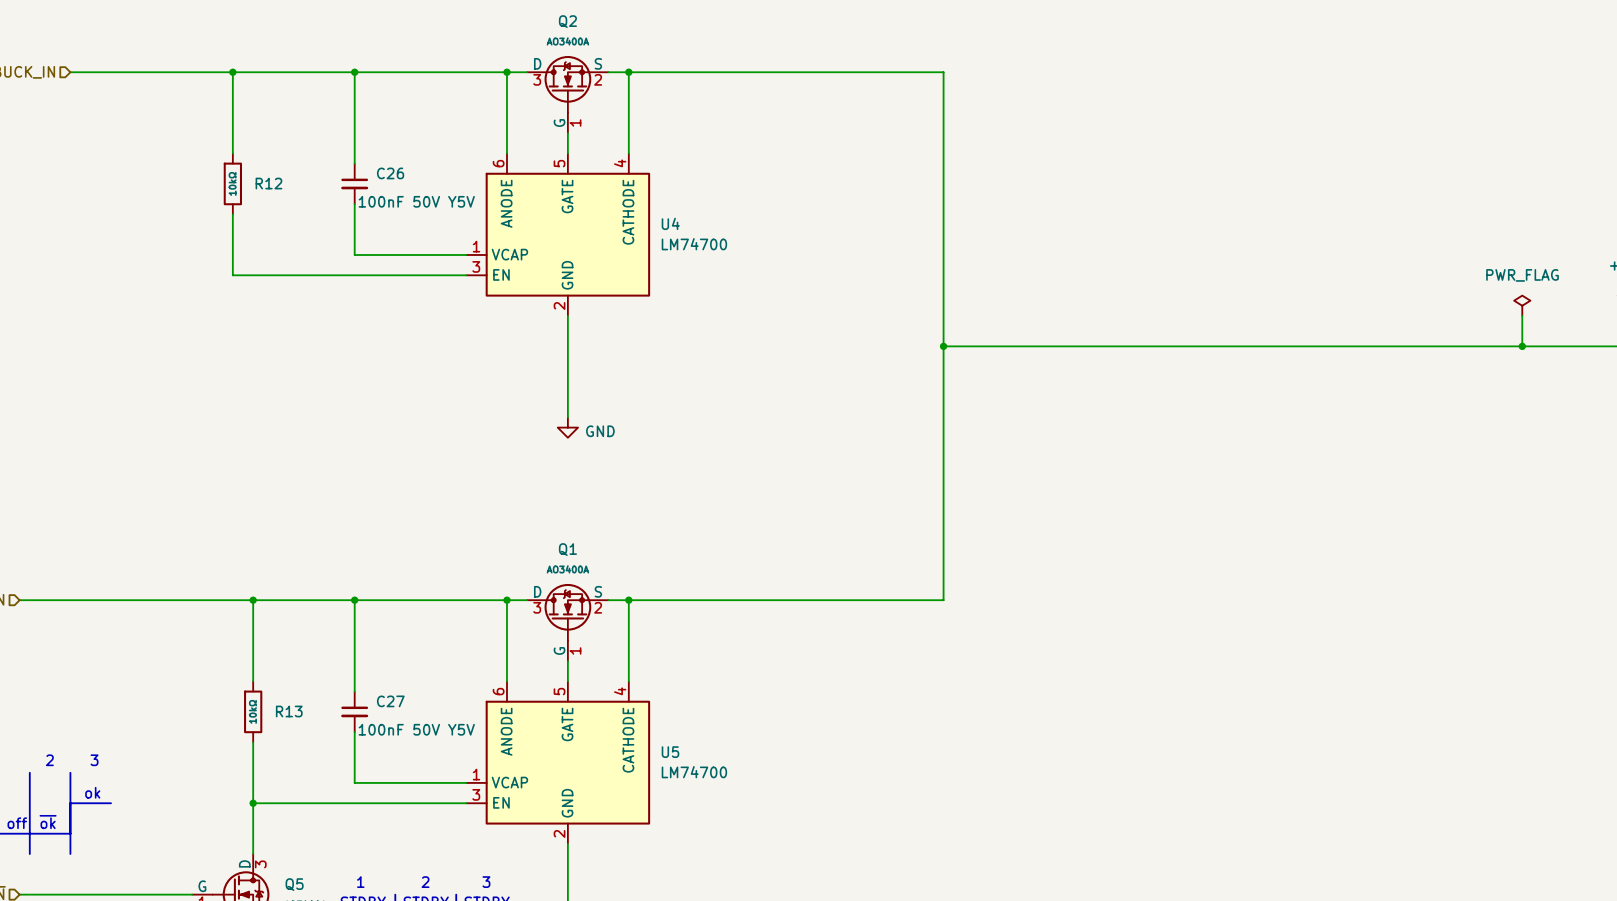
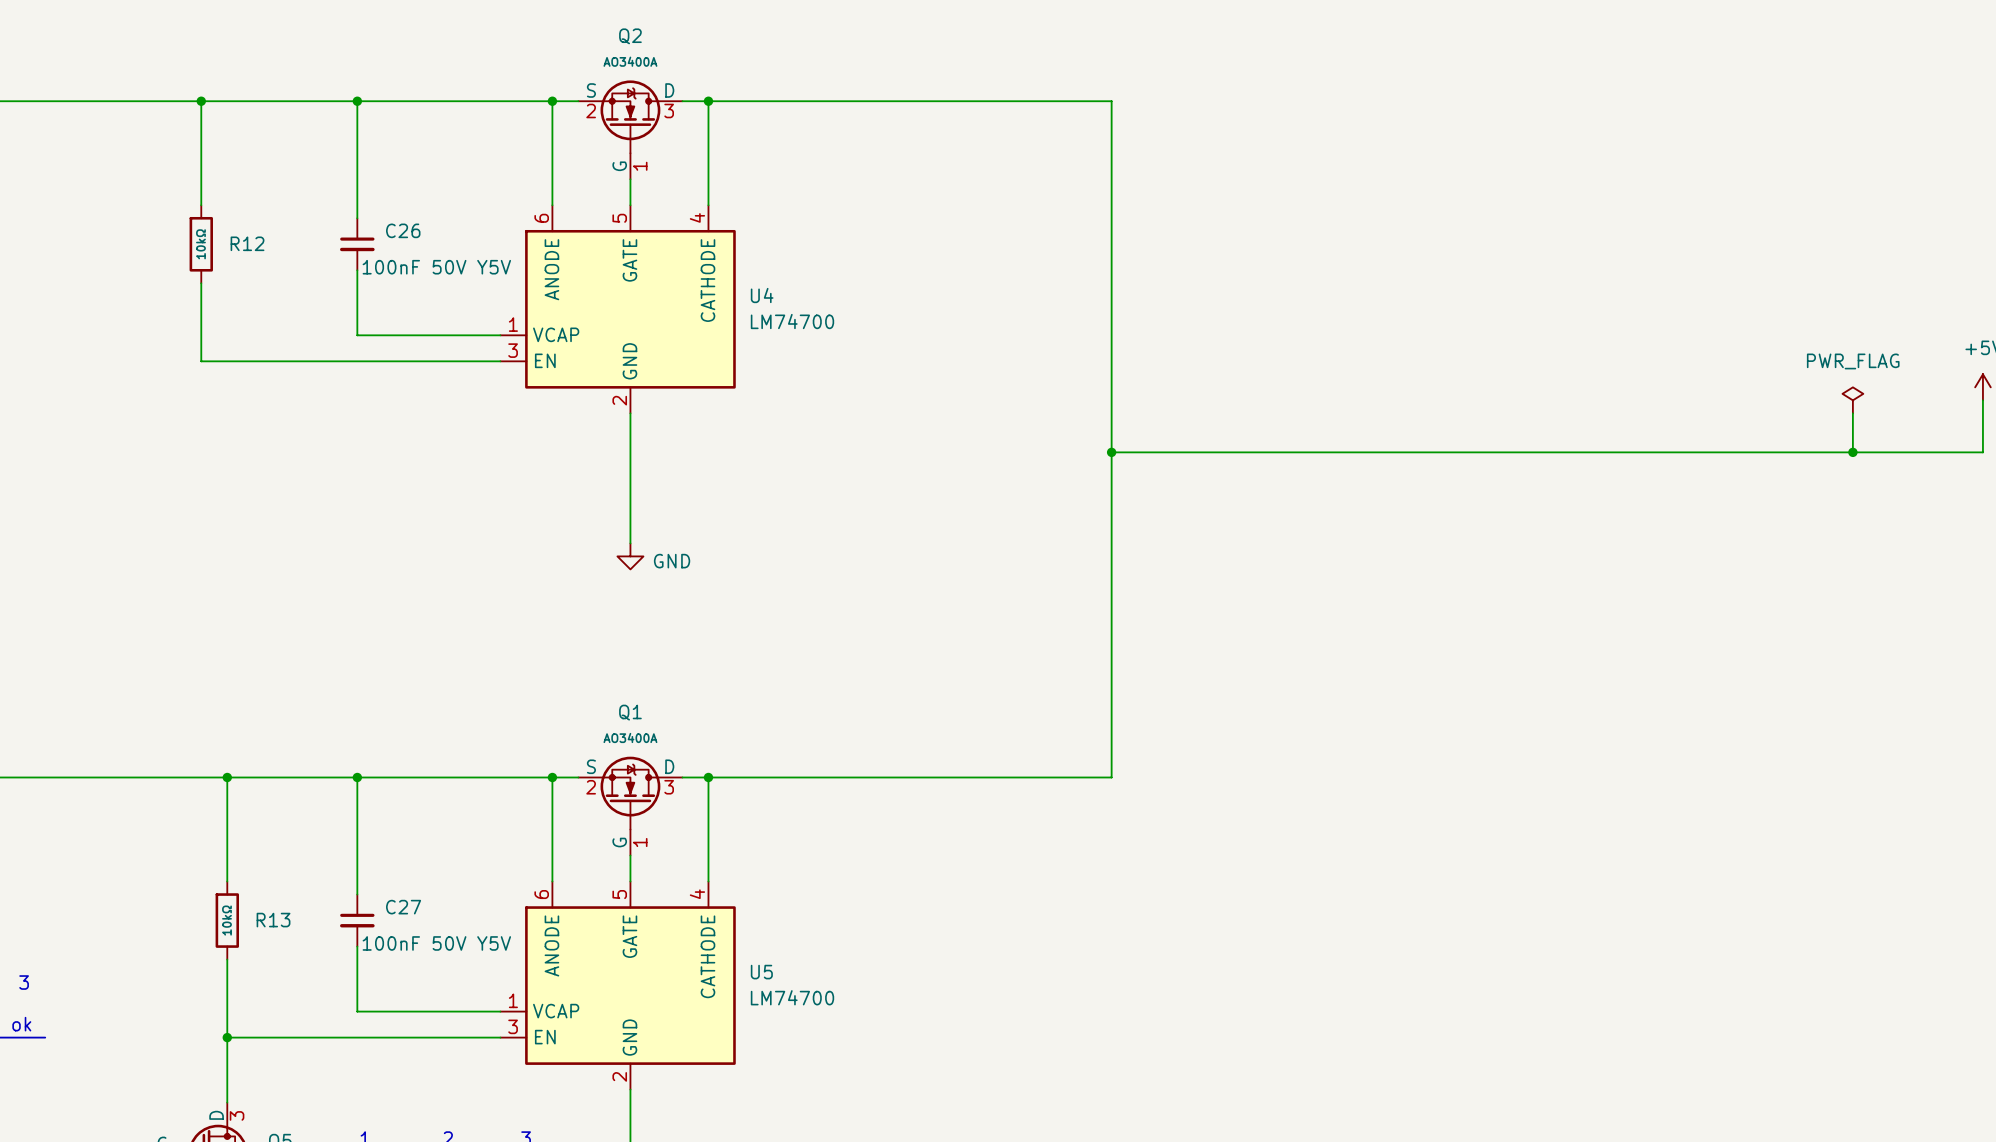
Q2 flip: as is (567, 84) -> left-right (630, 116)
Q1 flip: as is (567, 612) -> left-right (630, 793)

